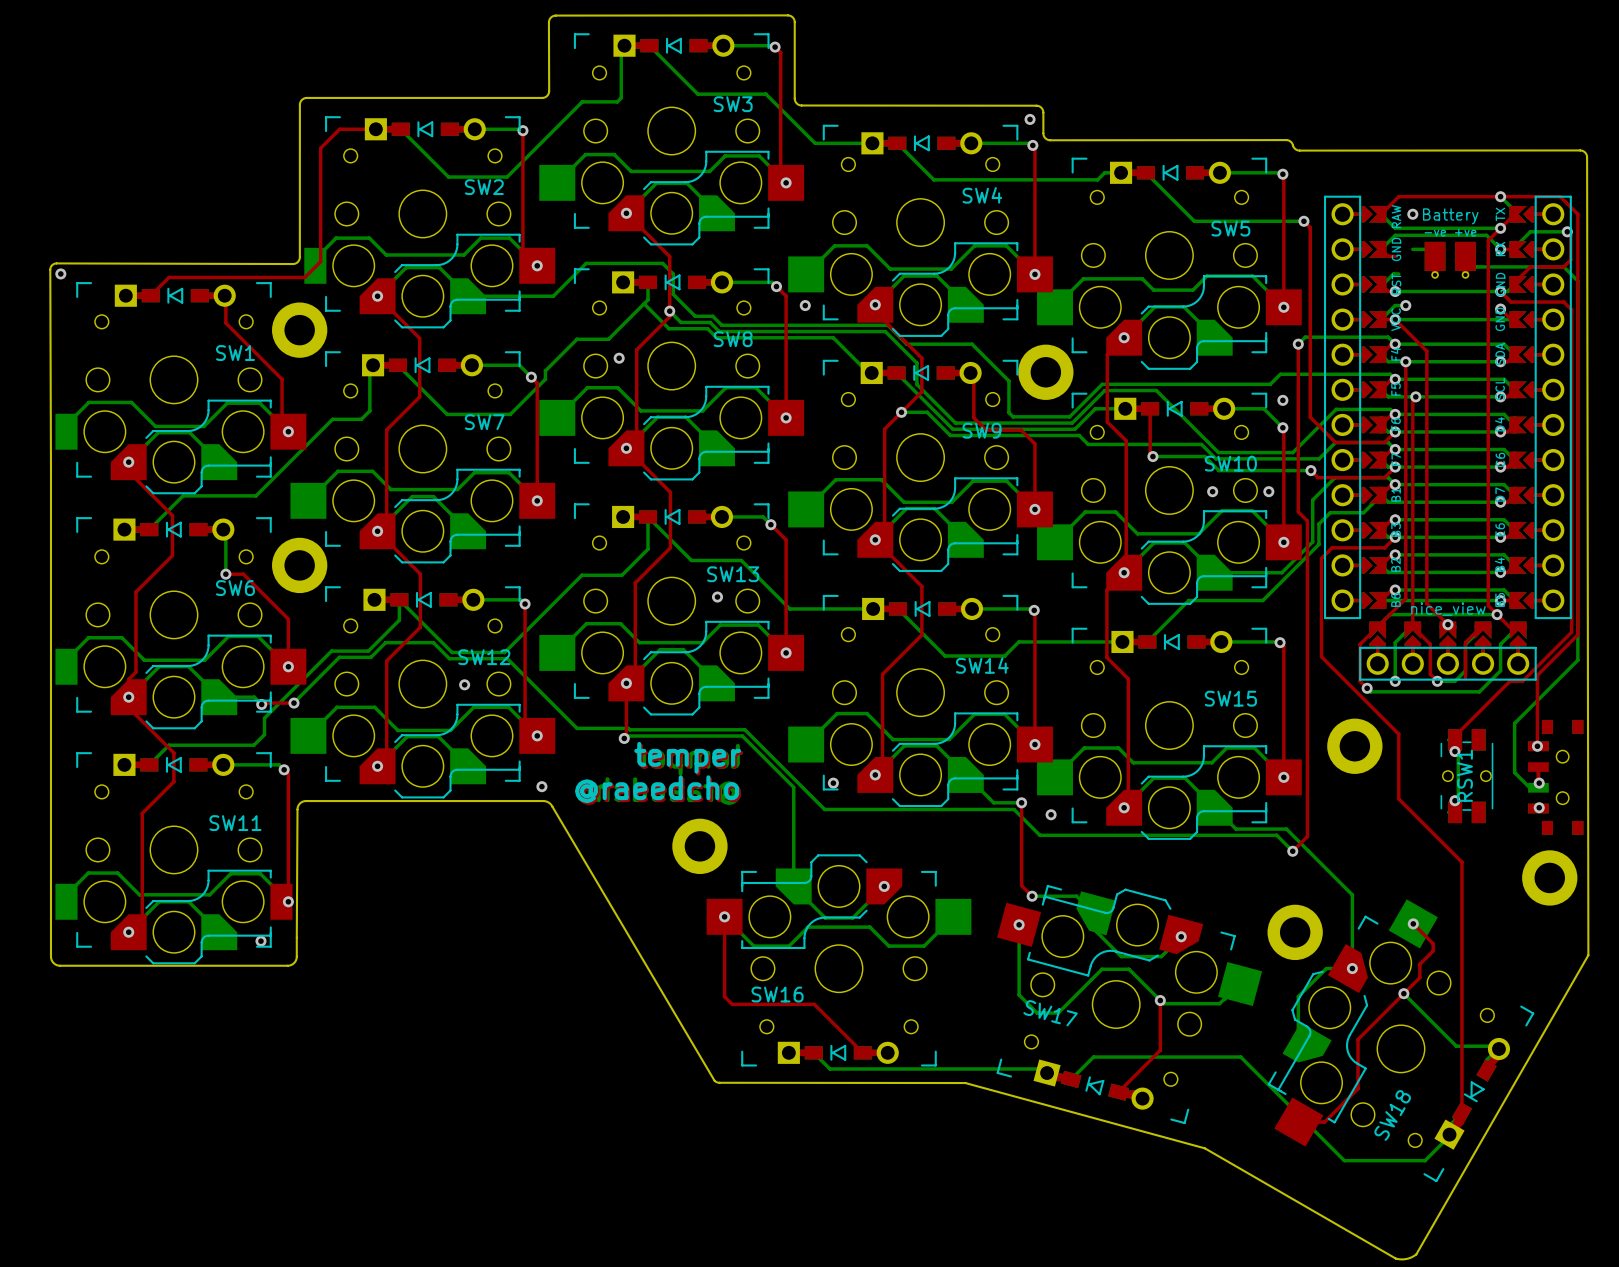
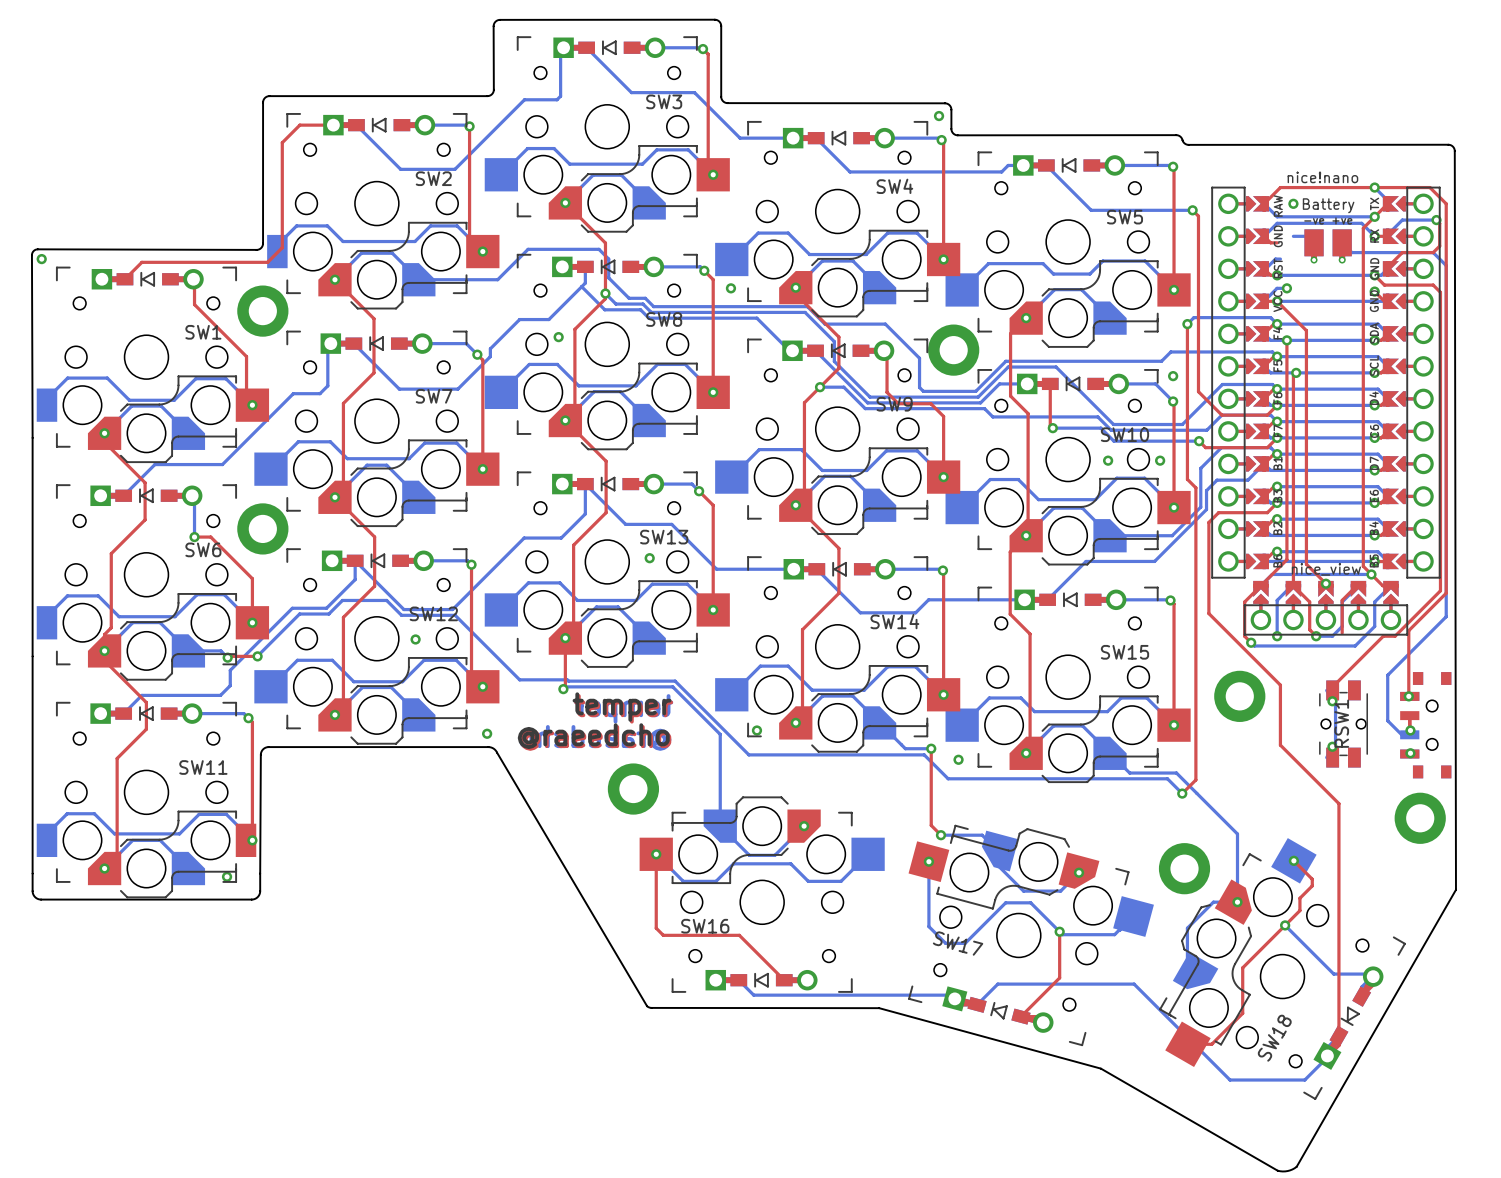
text: none -> nice!nano (1322, 177)

